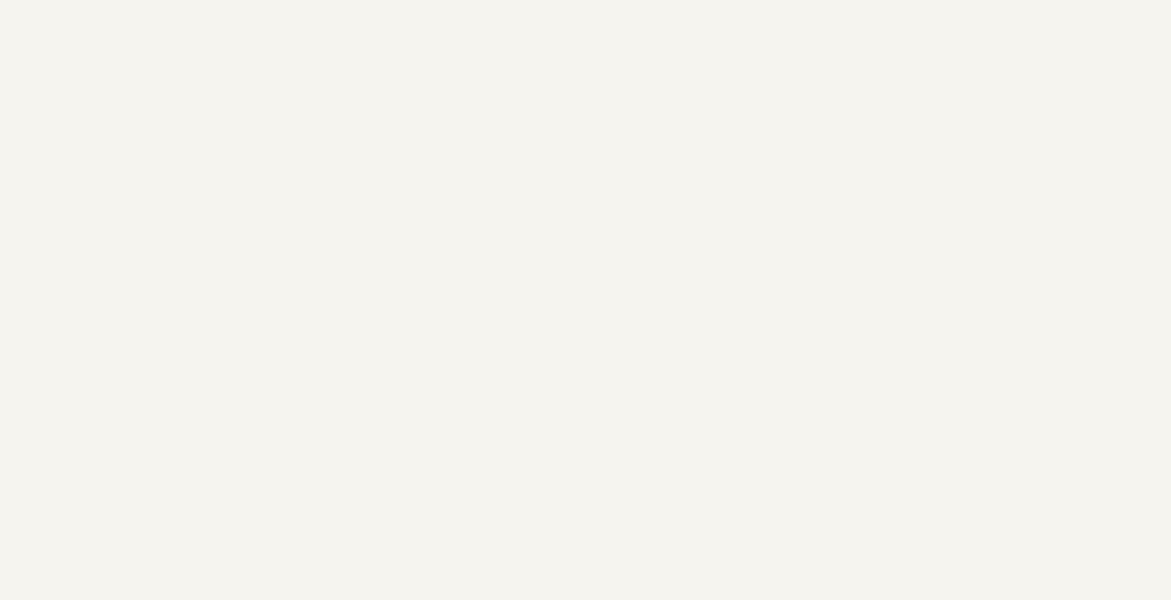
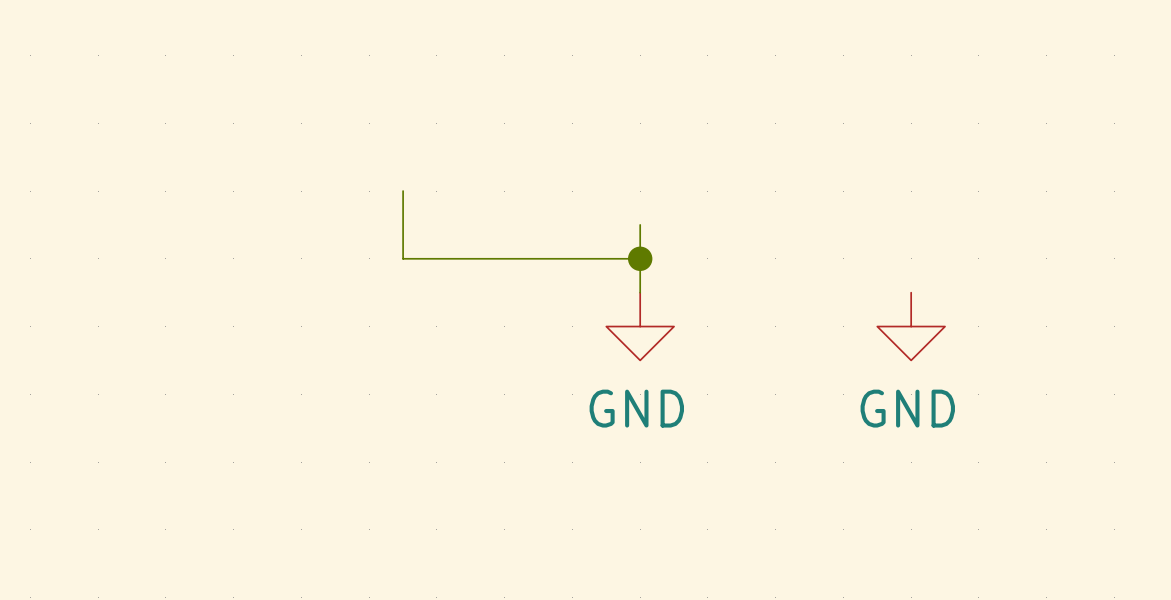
wire: none -> (403, 191) (403, 258) (640, 258)
wire: none -> (640, 224) (640, 292)
junction: none -> (640, 258)
power symbol: none -> GND (640, 326)
power symbol: none -> GND (911, 326)

